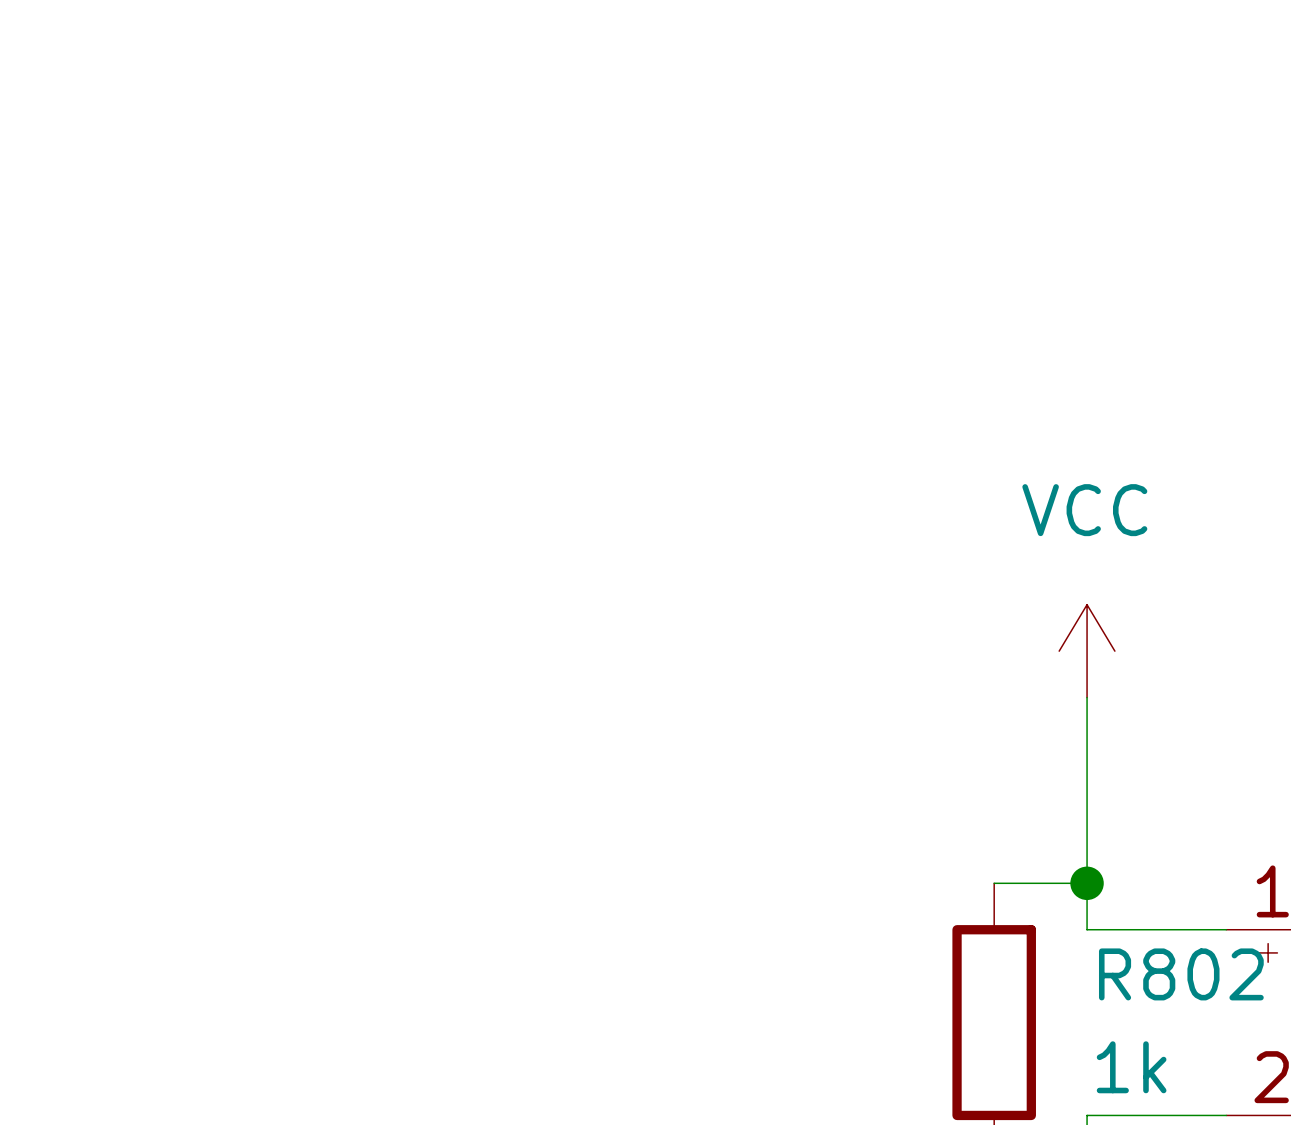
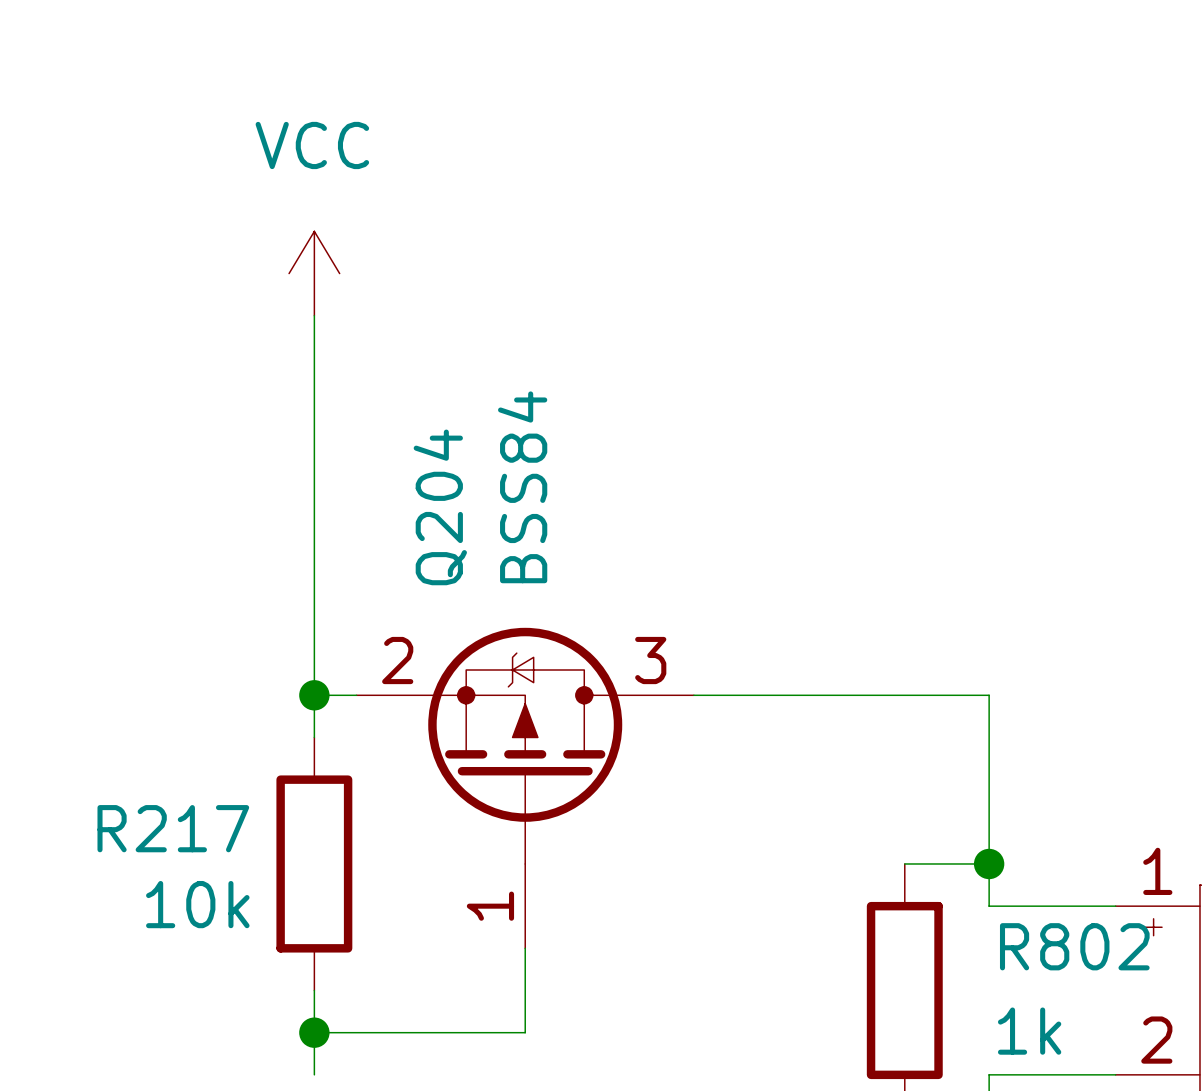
wire: none -> (314, 315) (314, 737)
power symbol position: VCC (1087, 651) -> VCC (314, 273)
wire: none -> (314, 695) (356, 695)
junction: none -> (314, 695)
wire: none -> (693, 695) (989, 695)
Q204: none -> BSS84 (525, 788)
R217: none -> 10k (314, 863)
wire: none -> (525, 948) (525, 1032) (314, 1032)
wire: none -> (314, 990) (314, 1074)
junction: none -> (314, 1032)

